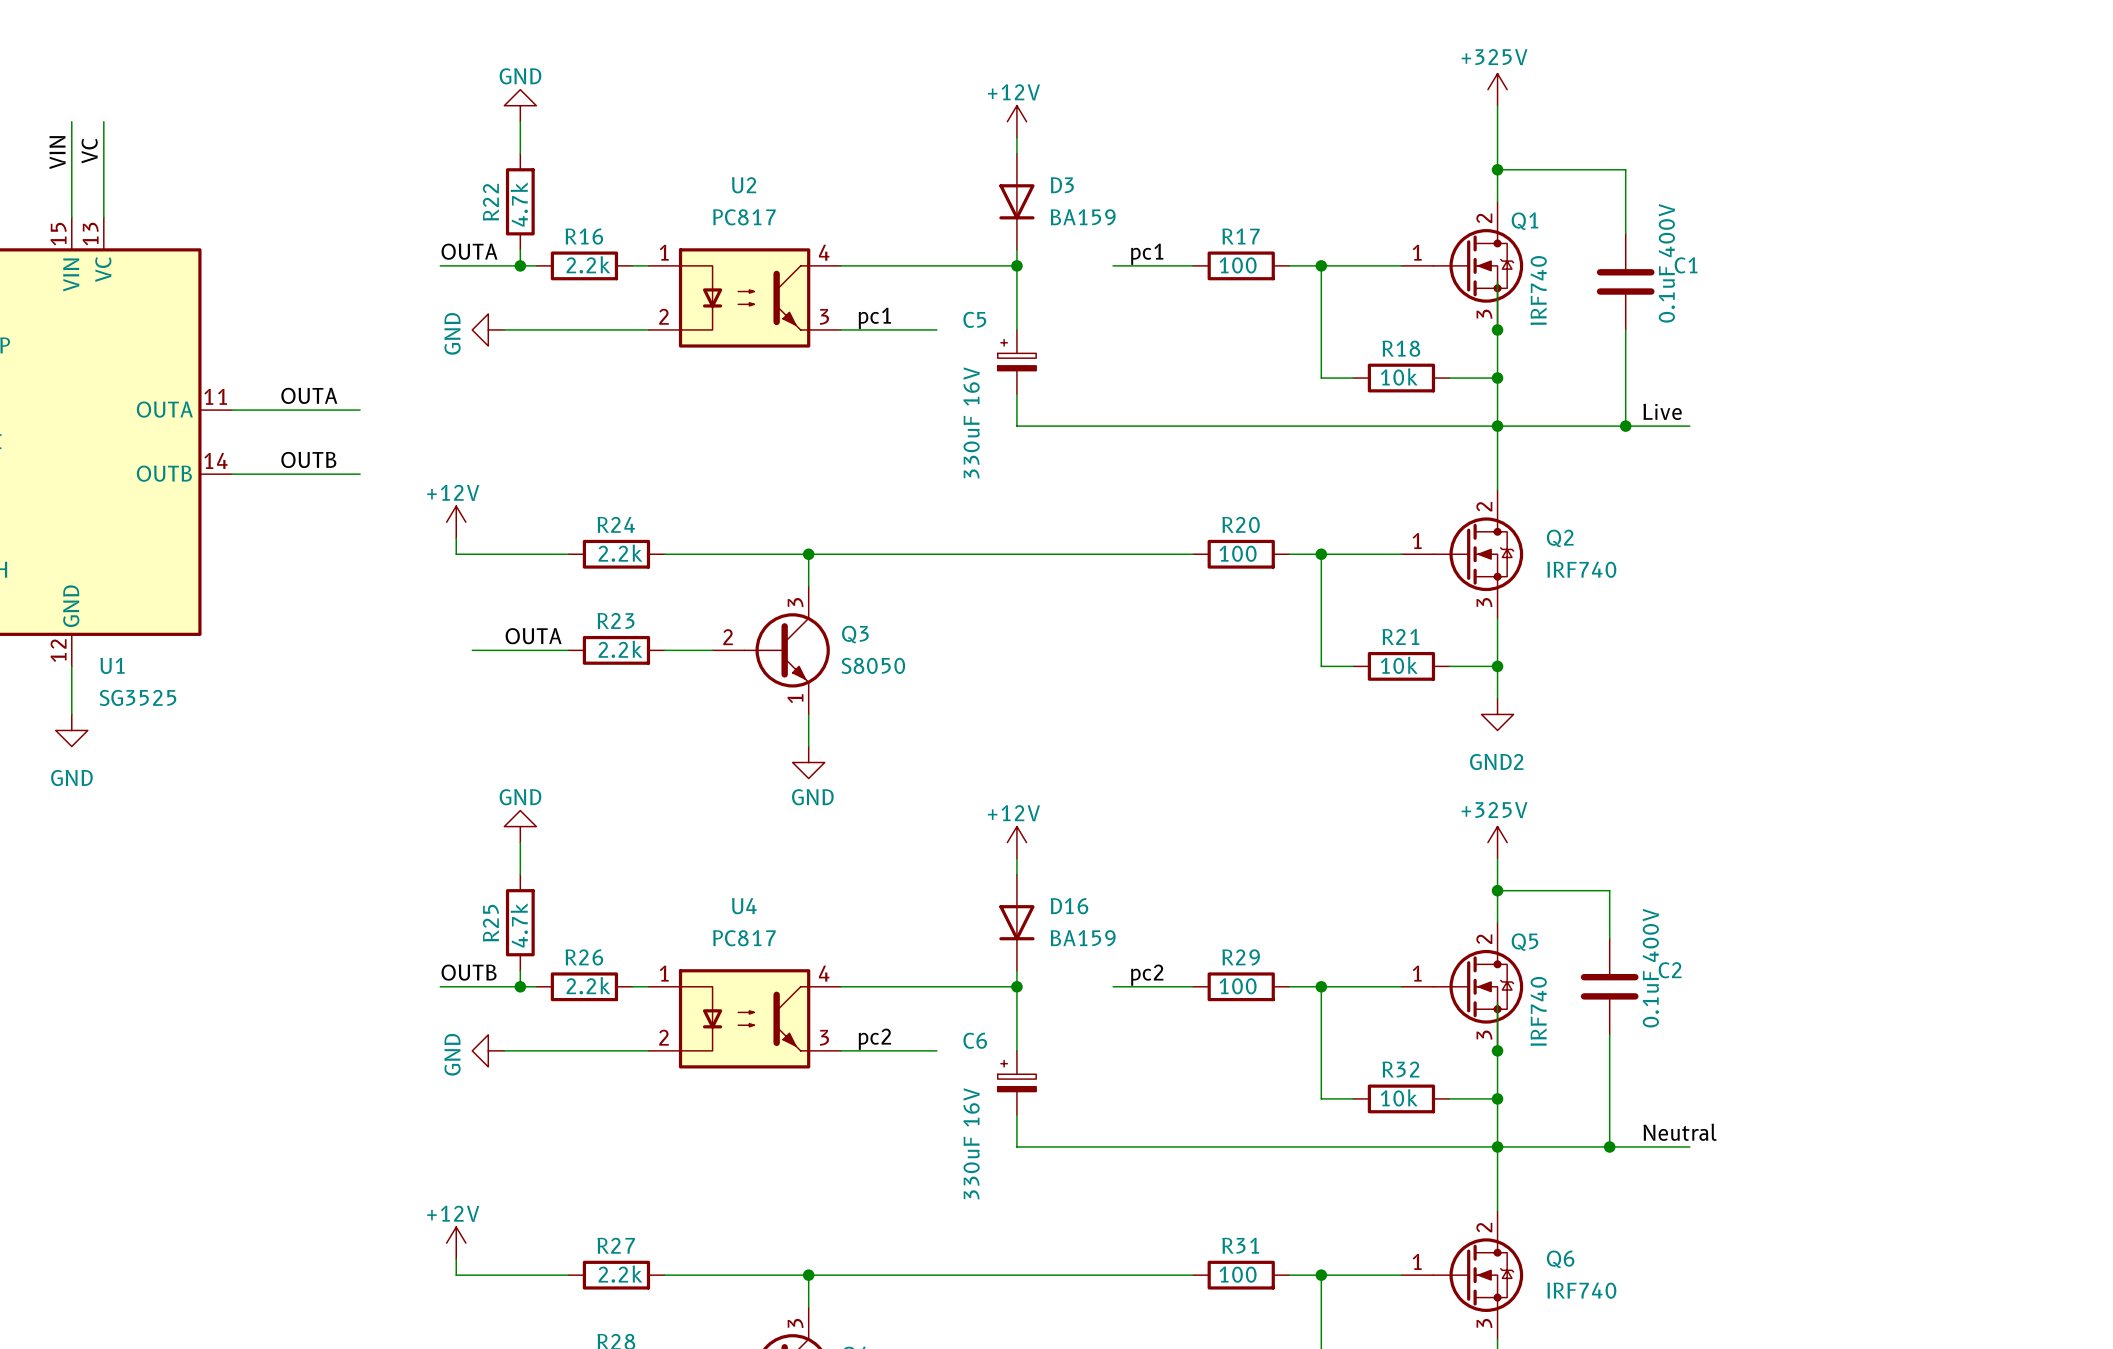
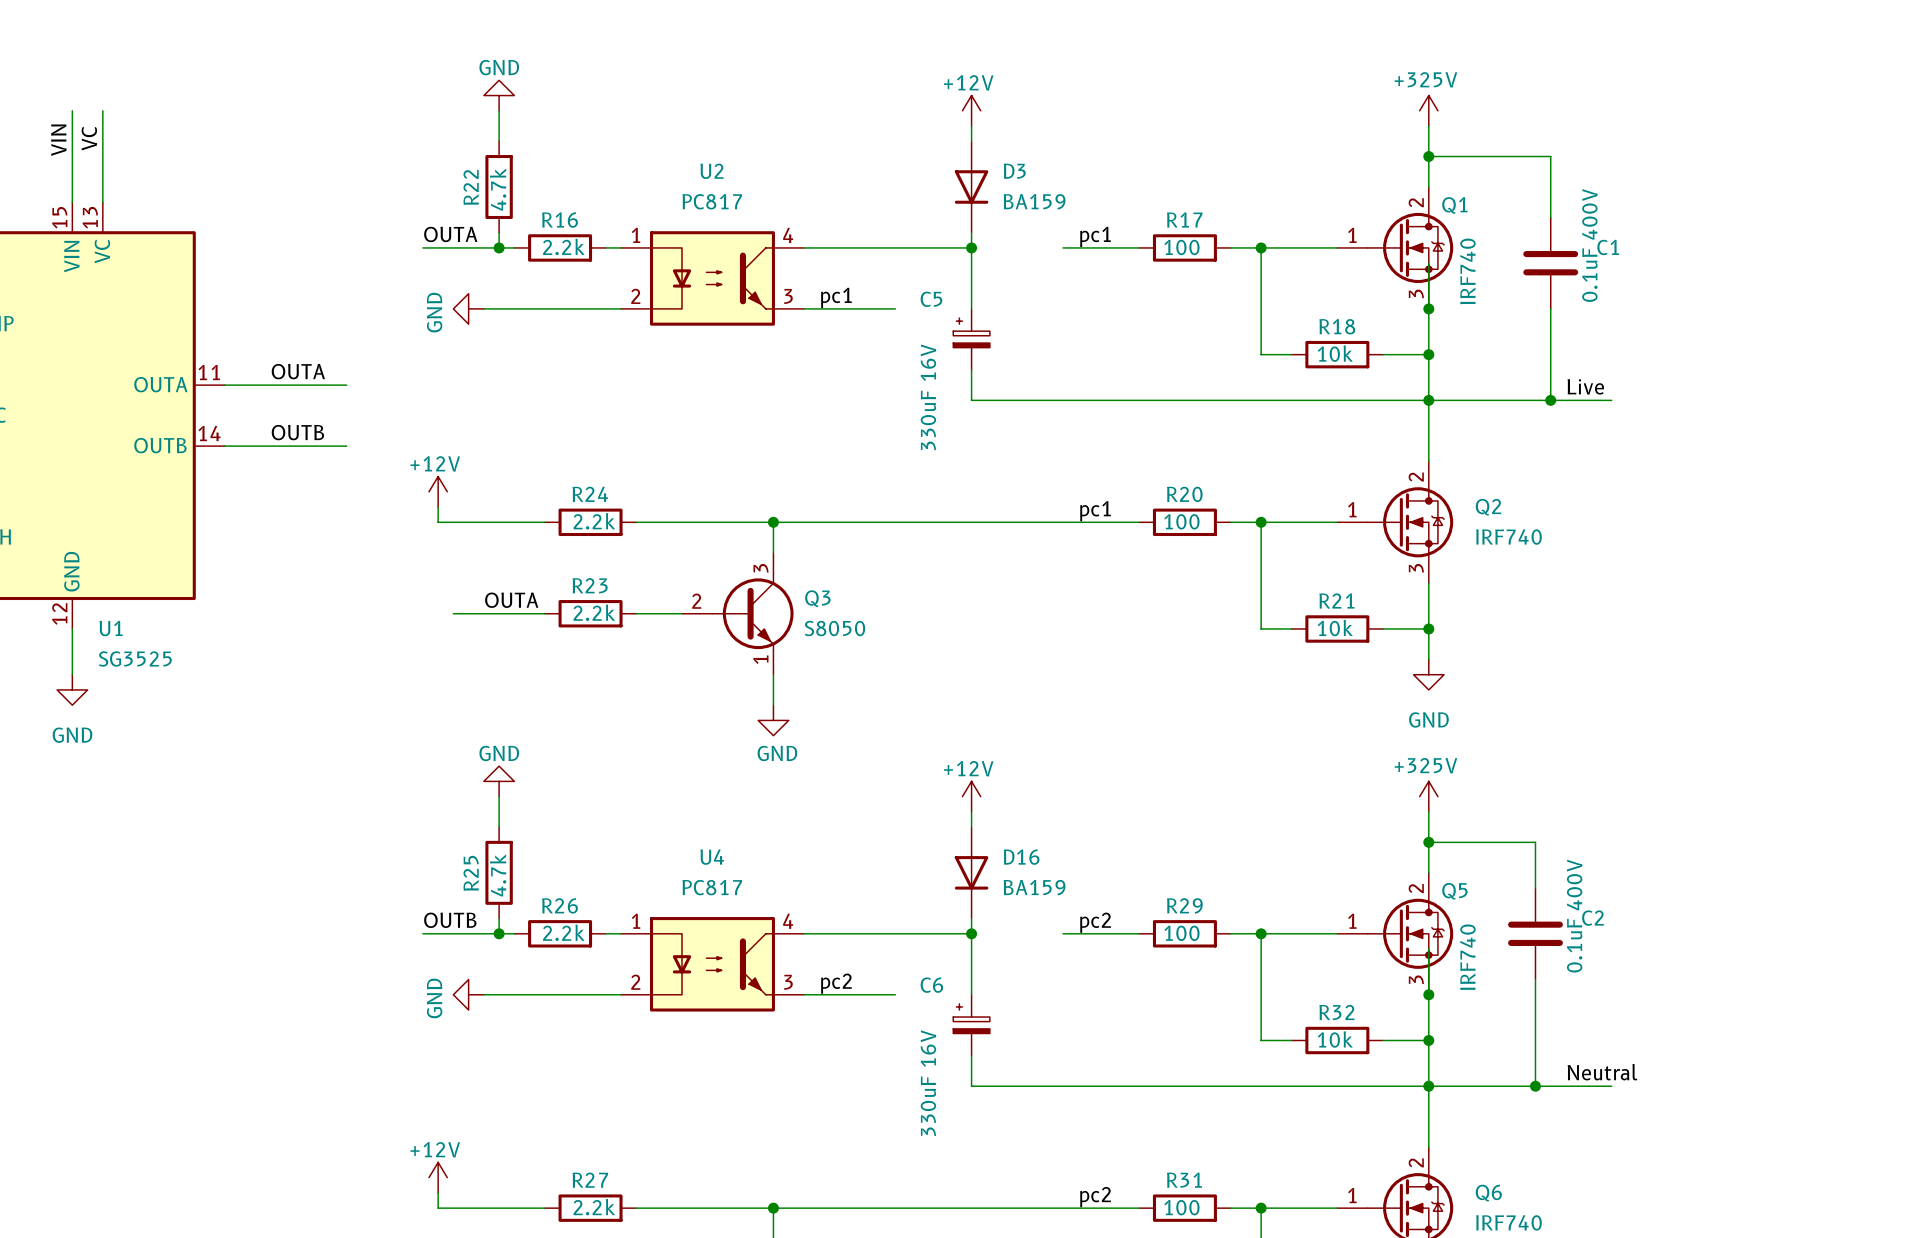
power symbol position: +325V (1497, 89) -> +325V (1428, 110)
label: none -> pc1 (1095, 511)
power symbol: GND2 (1497, 714) -> GND (1428, 674)
label: none -> pc2 (1095, 1197)

